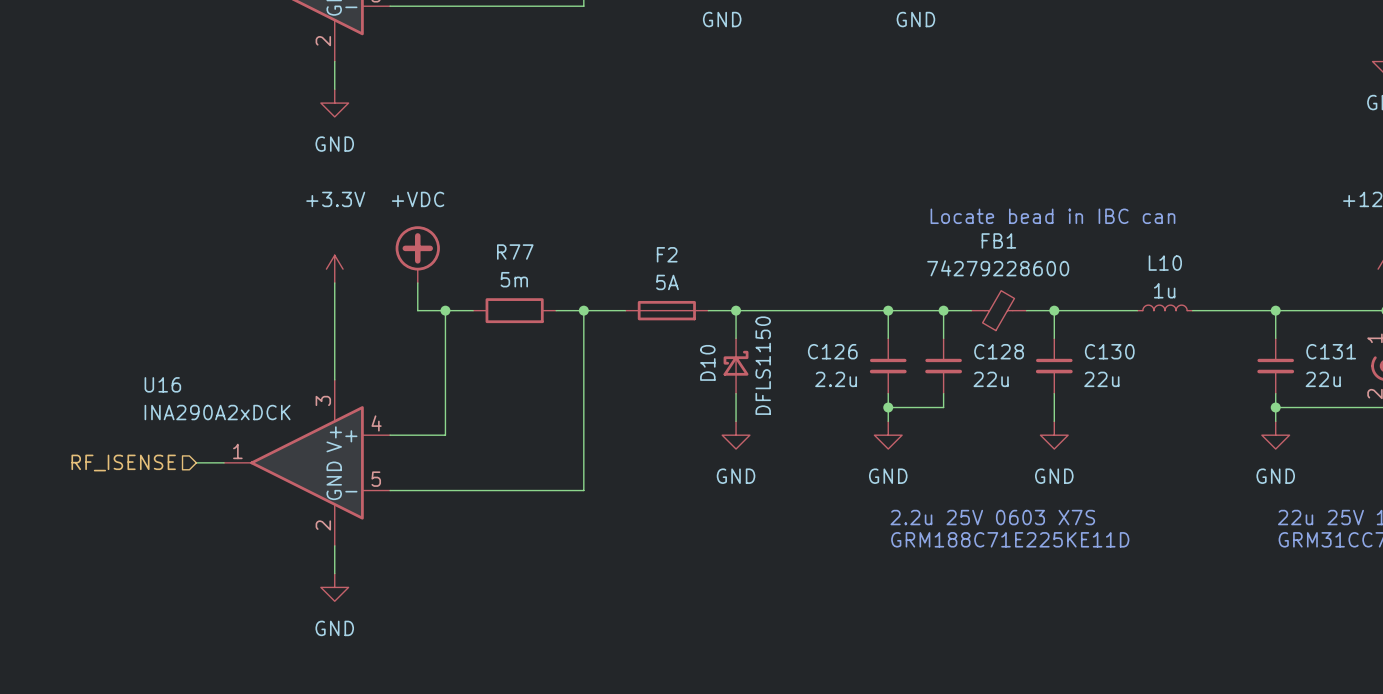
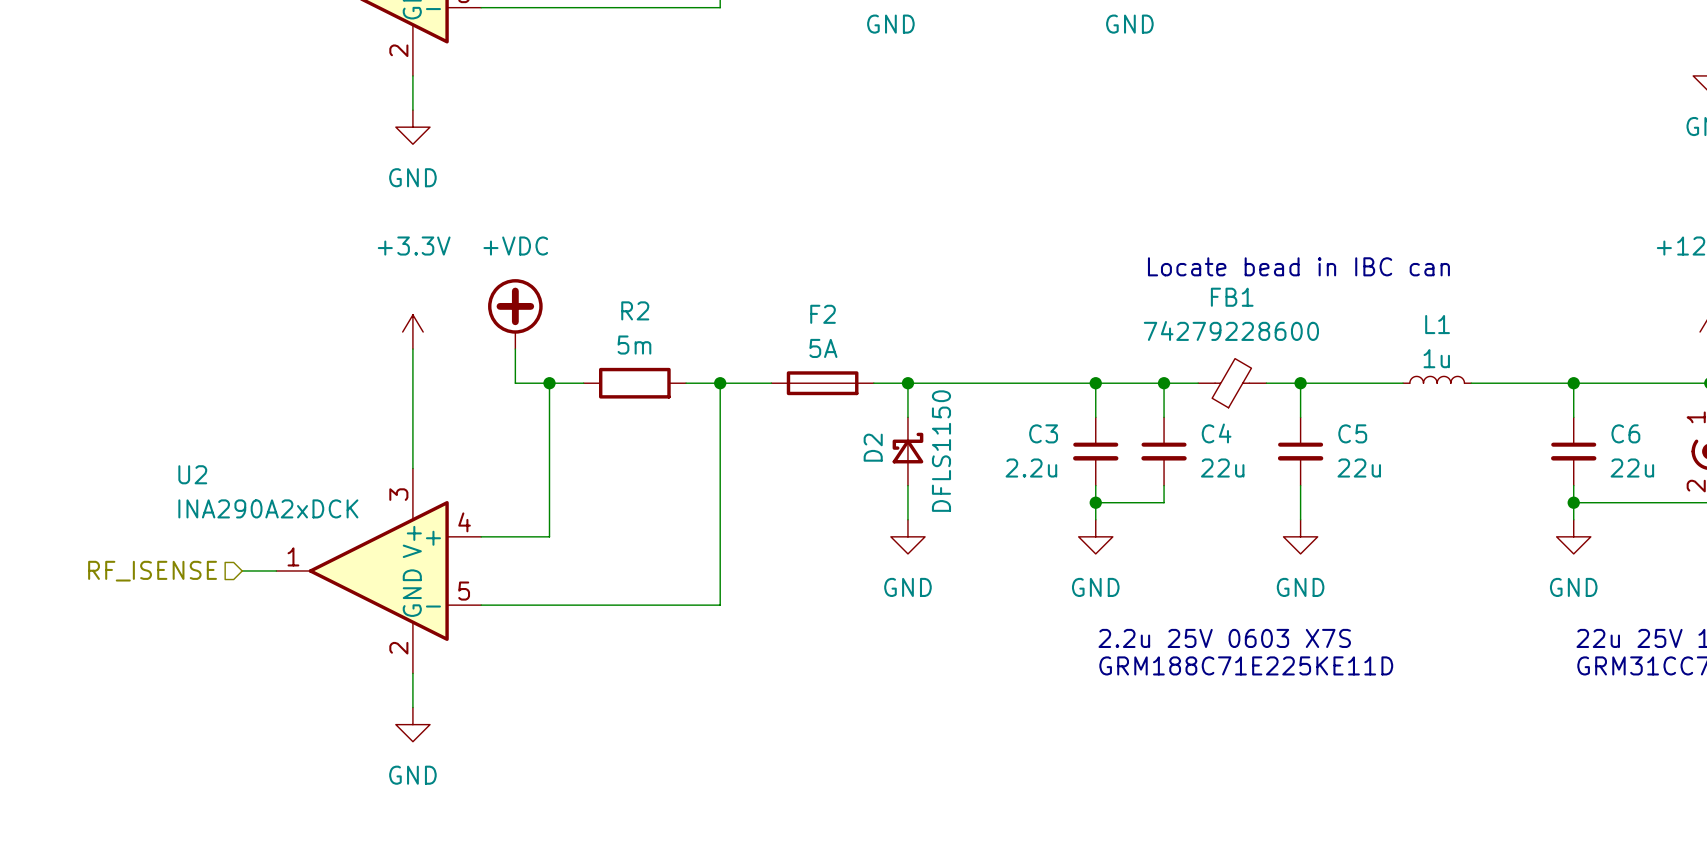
R77 name: R77 (515, 252) -> R2 (635, 310)
L10 name: L10 (1165, 263) -> L1 (1437, 324)
C126 name: C126 (832, 351) -> C3 (1043, 433)
C128 name: C128 (999, 351) -> C4 (1216, 433)
C130 name: C130 (1109, 351) -> C5 (1352, 433)
C131 name: C131 (1331, 351) -> C6 (1625, 433)
D10 name: D10 (707, 362) -> D2 (873, 447)
U16 name: U16 (162, 384) -> U2 (192, 474)

